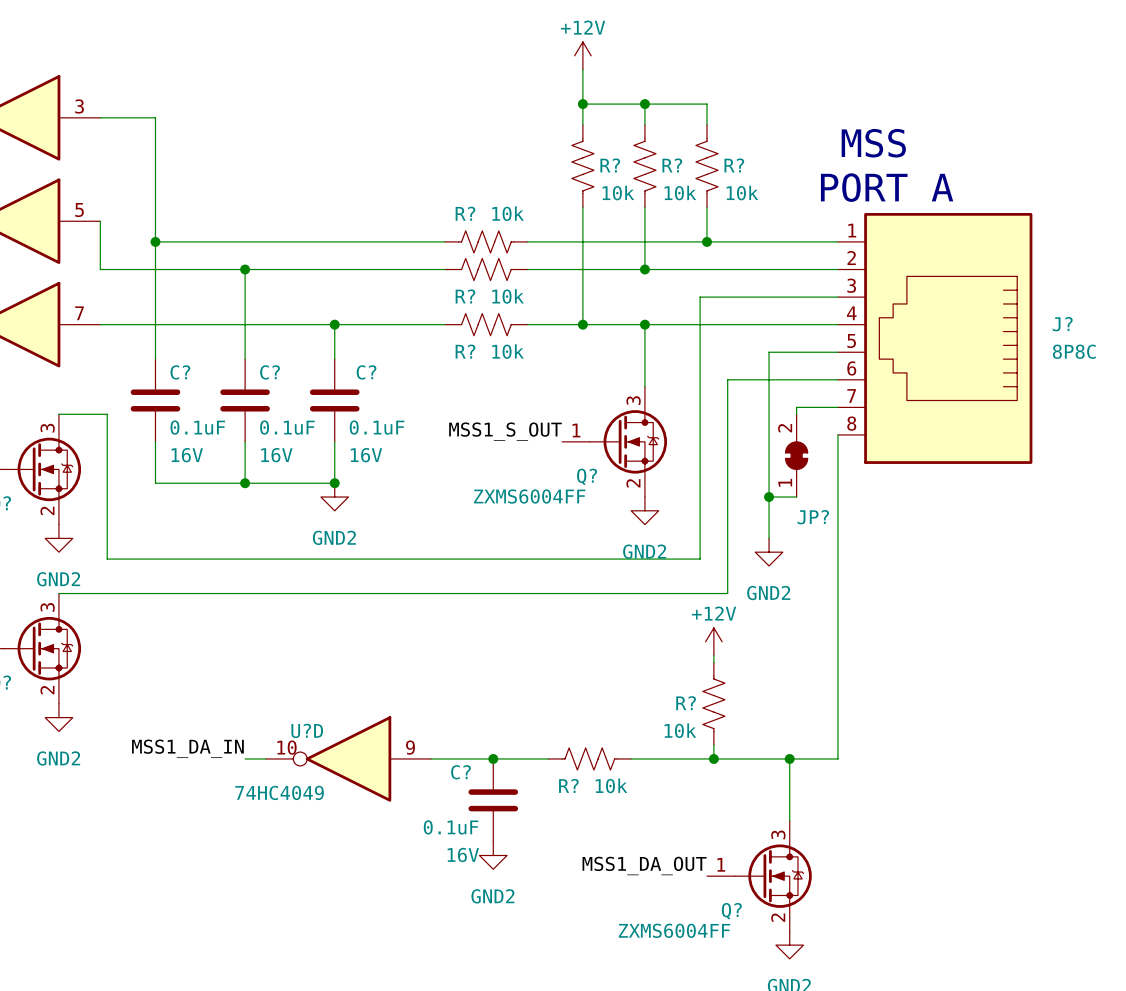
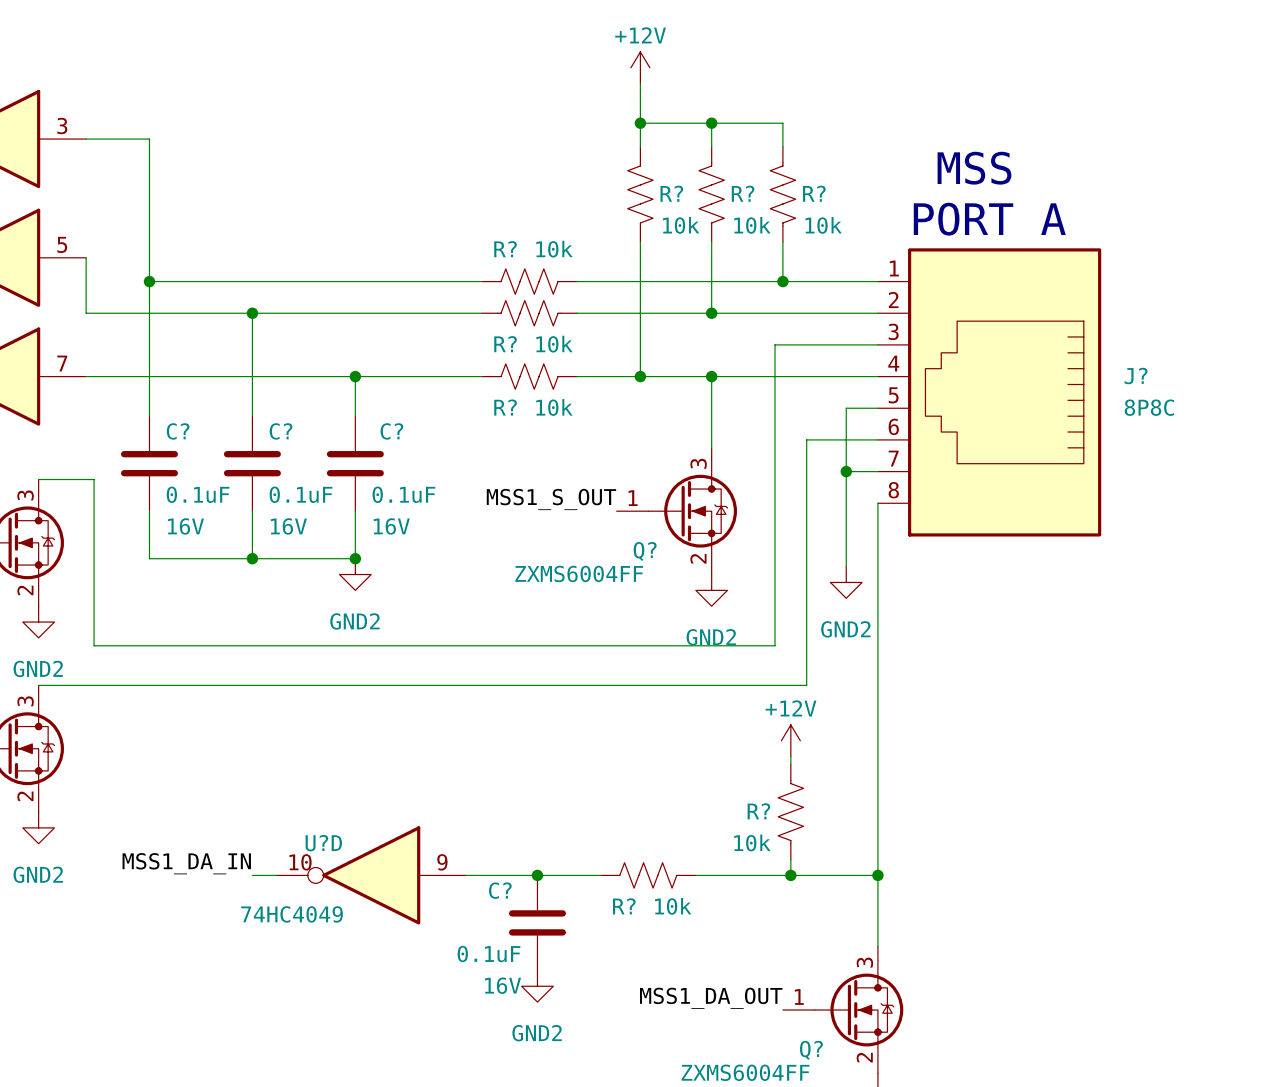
J? position: (935, 338) -> (989, 392)
wire: (769, 352) (769, 538) -> (854, 408) (846, 408) (846, 566)
junction: none -> (846, 471)
wire: (837, 434) (837, 758) (789, 758) -> (877, 503) (877, 875)
JP?: (796, 455) -> none
wire: (769, 497) (796, 497) -> (846, 471) (877, 471)
junction: (769, 497) -> none
power symbol position: GND2 (769, 552) -> GND2 (846, 582)

